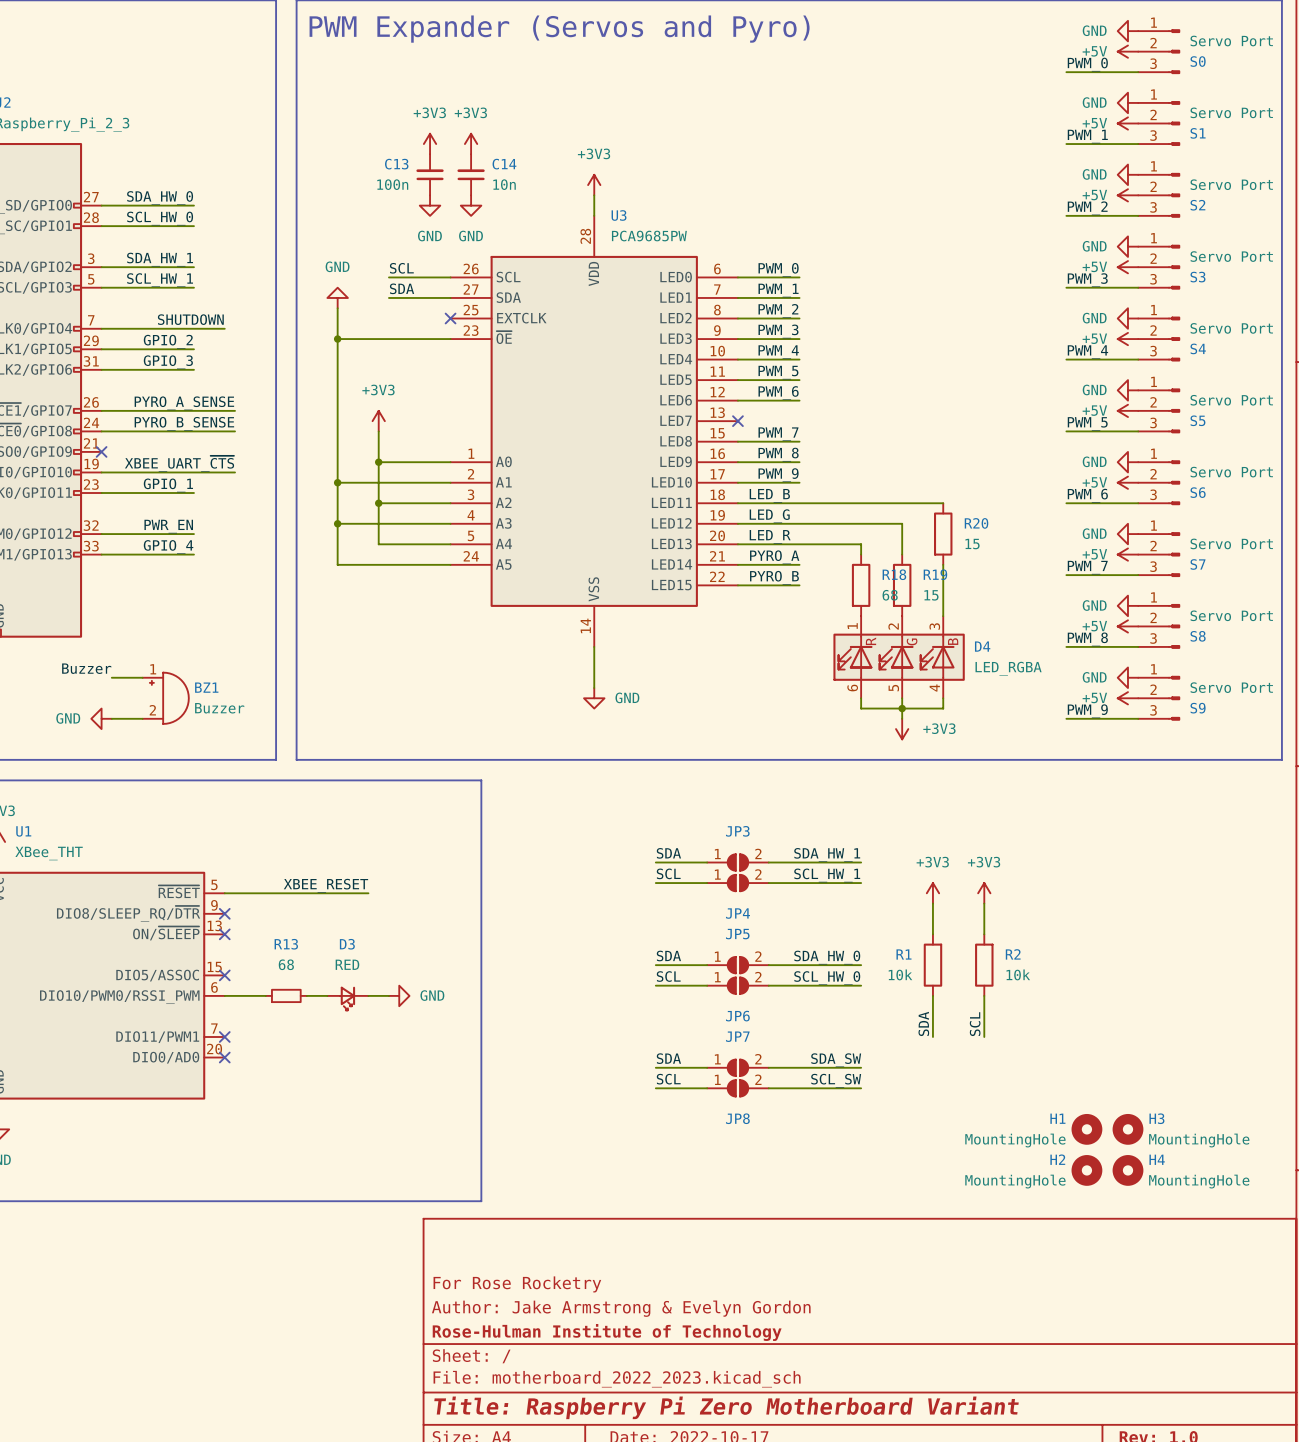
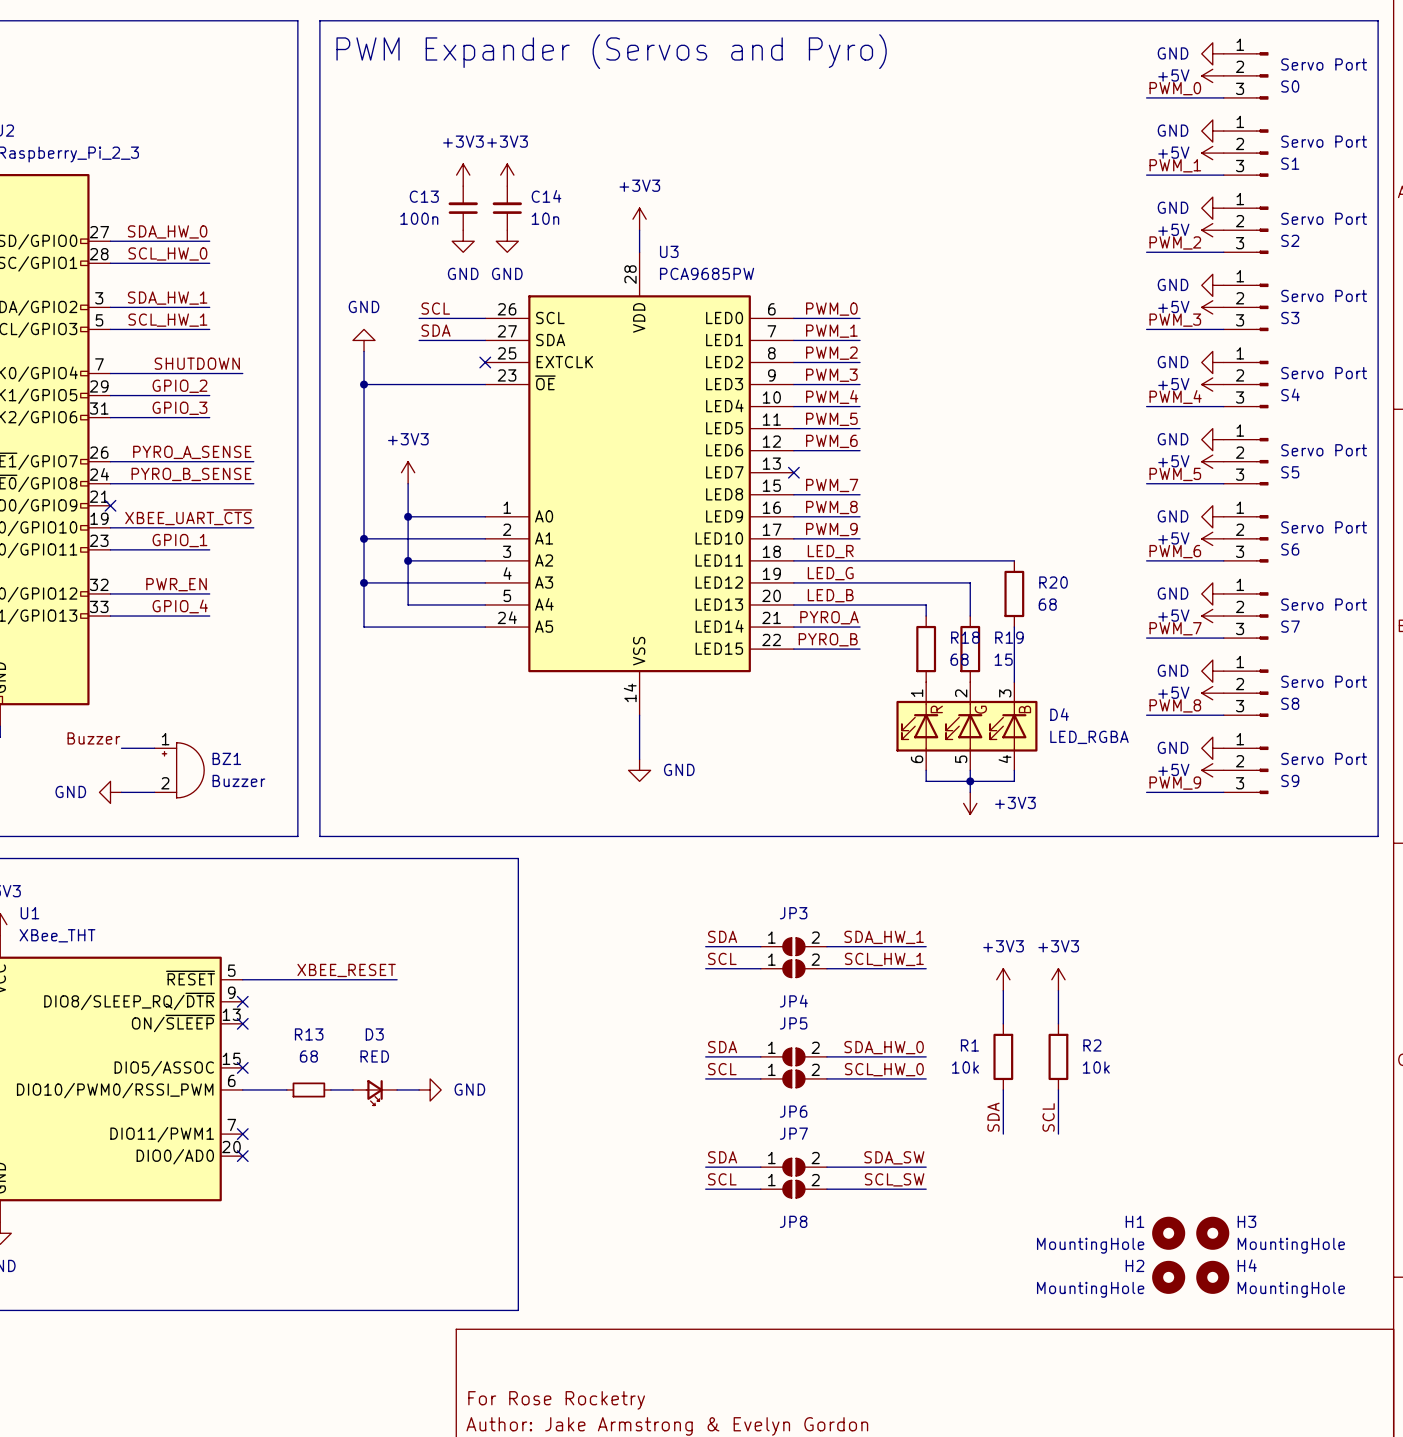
label: LED_B (769, 495) -> LED_R (830, 551)
label: LED_R (770, 536) -> LED_B (830, 595)
R20 value: 15 (972, 544) -> 68 (1047, 604)

